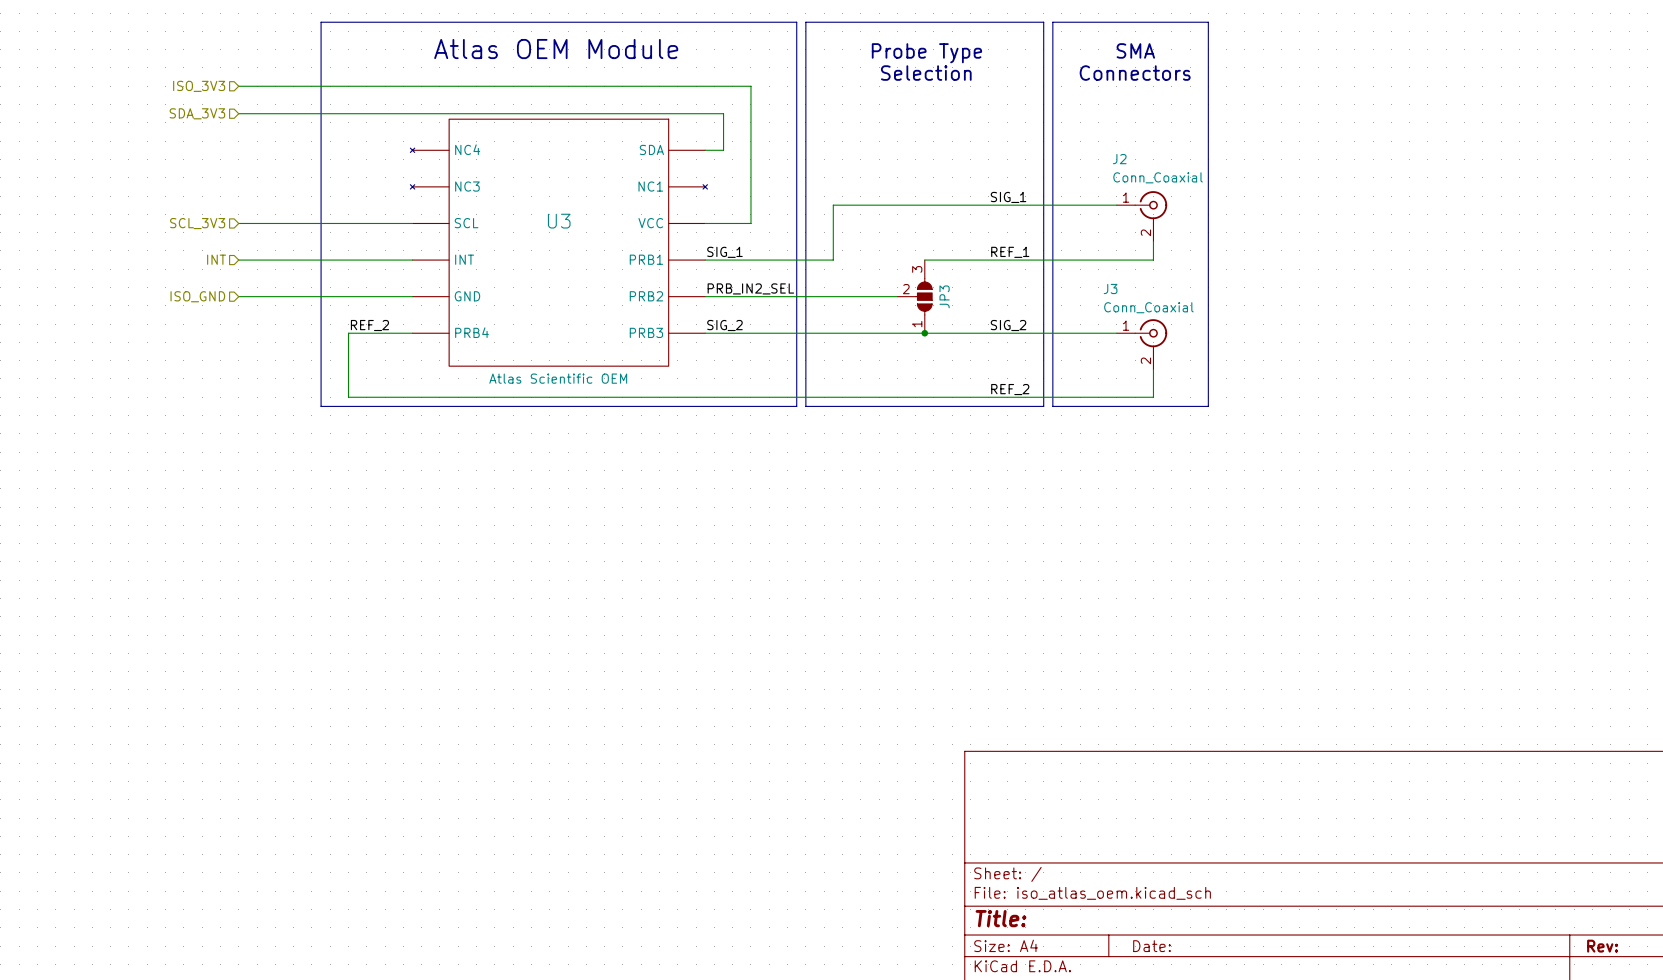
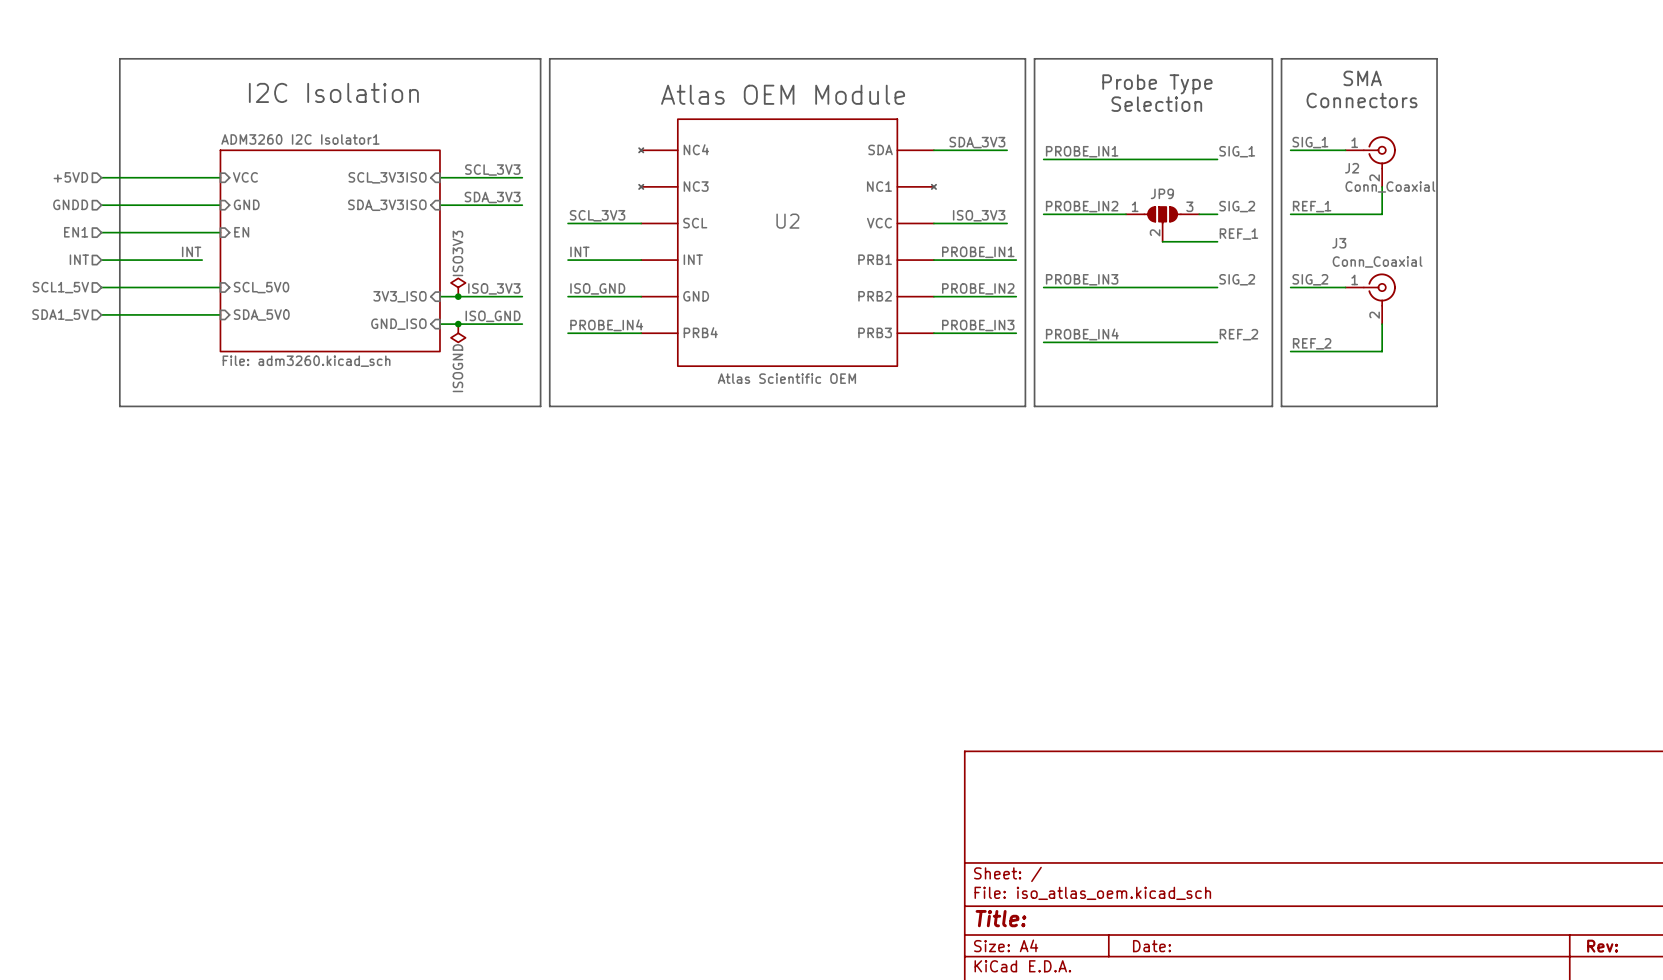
text: Atlas OEM Module (556, 49) -> none
text: SMA (1135, 50) -> none
text: Probe Type (926, 53) -> none
line: none -> (1281, 58) (1437, 58) (1437, 406) (1281, 406) (1281, 58)
text: Selection (926, 73) -> none
text: Connectors (1135, 73) -> none
text: none -> SMA (1362, 78)
text: none -> Probe Type (1157, 84)
hierarchical label: ISO_3V3 (199, 86) -> none
wire: (238, 86) (750, 86) (750, 223) (705, 223) -> none
text: none -> I2C Isolation (333, 92)
text: none -> Atlas OEM Module (783, 94)
text: none -> Connectors (1362, 100)
text: none -> Selection (1156, 104)
hierarchical label: SDA_3V3 (197, 113) -> none
wire: (238, 113) (723, 113) (723, 150) (705, 150) -> none
label: none -> SDA_3V3 (977, 142)
label: none -> SIG_1 (1310, 142)
wire: none -> (933, 150) (1007, 150)
wire: none -> (1290, 150) (1345, 150)
label: none -> PROBE_IN1 (1082, 151)
label: none -> SIG_1 (1237, 151)
wire: none -> (1043, 159) (1217, 159)
J2 name position: J2 (1119, 159) -> J2 (1352, 168)
label: none -> SCL_3V3 (492, 170)
hierarchical label: none -> +5VD (70, 177)
wire: none -> (101, 177) (220, 177)
sheet pin: none -> VCC (245, 177)
sheet pin: none -> SCL_3V3ISO (387, 177)
wire: none -> (439, 177) (522, 177)
J2 value position: Conn_Coaxial (1158, 177) -> Conn_Coaxial (1390, 186)
wire: none -> (1382, 186) (1382, 214) (1290, 214)
label: none -> SDA_3V3 (492, 197)
label: SIG_1 (1008, 197) -> none
hierarchical label: none -> GNDD (70, 204)
sheet pin: none -> GND (246, 204)
wire: none -> (101, 205) (220, 205)
sheet pin: none -> SDA_3V3ISO (387, 205)
wire: none -> (439, 205) (522, 205)
wire: (1116, 205) (833, 205) (833, 260) (705, 260) -> none
label: none -> PROBE_IN2 (1082, 206)
label: none -> SIG_2 (1237, 206)
label: none -> REF_1 (1312, 206)
wire: none -> (1043, 214) (1126, 214)
wire: none -> (1199, 214) (1217, 214)
label: none -> SCL_3V3 (597, 215)
label: none -> ISO_3V3 (979, 215)
J2 position: (1142, 216) -> (1370, 161)
hierarchical label: SCL_3V3 (197, 223) -> none
wire: (238, 223) (412, 223) -> none
wire: none -> (568, 223) (641, 223)
wire: none -> (933, 223) (1007, 223)
JP9: none -> (1162, 224)
hierarchical label: none -> EN1 (76, 232)
wire: none -> (101, 232) (220, 232)
sheet pin: none -> EN (241, 232)
label: none -> REF_1 (1238, 234)
wire: (1153, 241) (1153, 260) (1016, 260) -> none
wire: none -> (1162, 241) (1217, 241)
U3: Atlas Scientific OEM (558, 242) -> none
U2: none -> Atlas Scientific OEM (787, 242)
sheet ADM3260 I2C Isolator1: none -> File: adm3260.kicad_sch (330, 250)
label: none -> INT (191, 251)
label: none -> INT (579, 251)
label: SIG_1 (724, 252) -> none
label: none -> PROBE_IN1 (978, 252)
label: REF_1 (1010, 252) -> none
hierarchical label position: INT (216, 259) -> INT (79, 259)
wire: none -> (101, 260) (202, 260)
wire: (238, 260) (412, 260) -> none
wire: none -> (568, 260) (641, 260)
label: none -> PROBE_IN3 (1082, 279)
label: none -> SIG_2 (1237, 279)
label: none -> SIG_2 (1310, 279)
hierarchical label: none -> SCL1_5V (60, 287)
wire: none -> (101, 287) (220, 287)
sheet pin: none -> SCL_5V0 (261, 287)
power symbol: none -> ISO3V3 (458, 287)
wire: none -> (1043, 287) (1217, 287)
wire: none -> (1290, 287) (1345, 287)
label: none -> ISO_3V3 (494, 288)
label: none -> ISO_GND (597, 288)
label: PRB_IN2_SEL (750, 288) -> none
label: none -> PROBE_IN2 (978, 288)
hierarchical label: ISO_GND (197, 296) -> none
wire: (238, 296) (412, 296) -> none
sheet pin: none -> 3V3_ISO (399, 296)
wire: none -> (439, 296) (522, 296)
junction: none -> (458, 296)
wire: none -> (568, 296) (641, 296)
wire: (705, 296) (897, 296) -> none
JP3: (914, 296) -> none
wire: none -> (933, 296) (1016, 296)
wire: none -> (101, 314) (220, 314)
hierarchical label: none -> SDA1_5V (60, 315)
sheet pin: none -> SDA_5V0 (261, 315)
label: none -> ISO_GND (493, 316)
sheet pin: none -> GND_ISO (398, 324)
wire: none -> (439, 324) (522, 324)
junction: none -> (458, 324)
wire: none -> (1382, 324) (1382, 351) (1290, 351)
label: REF_2 (369, 325) -> none
label: none -> PROBE_IN4 (606, 325)
label: SIG_2 (724, 325) -> none
label: none -> PROBE_IN3 (978, 325)
label: SIG_2 (1008, 325) -> none
wire: (412, 333) (348, 333) (348, 397) (1153, 397) (1153, 369) -> none
power symbol: none -> ISOGND (458, 333)
wire: none -> (568, 333) (641, 333)
wire: (705, 333) (933, 333) -> none
junction: (924, 333) -> none
wire: (1016, 333) (1116, 333) -> none
label: none -> PROBE_IN4 (1082, 334)
label: none -> REF_2 (1238, 334)
wire: none -> (1043, 342) (1217, 342)
label: none -> REF_2 (1312, 343)
J3 position: (1142, 344) -> (1370, 298)
label: REF_2 (1010, 389) -> none
line: (321, 406) (321, 22) (796, 22) (796, 406) -> (805, 406) (796, 406)
line: (540, 406) (549, 406) -> (540, 406) (540, 58) (119, 58) (119, 406) (321, 406)
line: (805, 406) (805, 22) (1043, 22) (1043, 406) -> (1052, 406) (1043, 406)
line: (1025, 406) (1034, 406) -> (1025, 406) (1025, 58) (549, 58) (549, 406)
line: (1052, 406) (1052, 22) (1208, 22) (1208, 406) -> (1034, 406) (1034, 58) (1272, 58) (1272, 406) (1208, 406)

